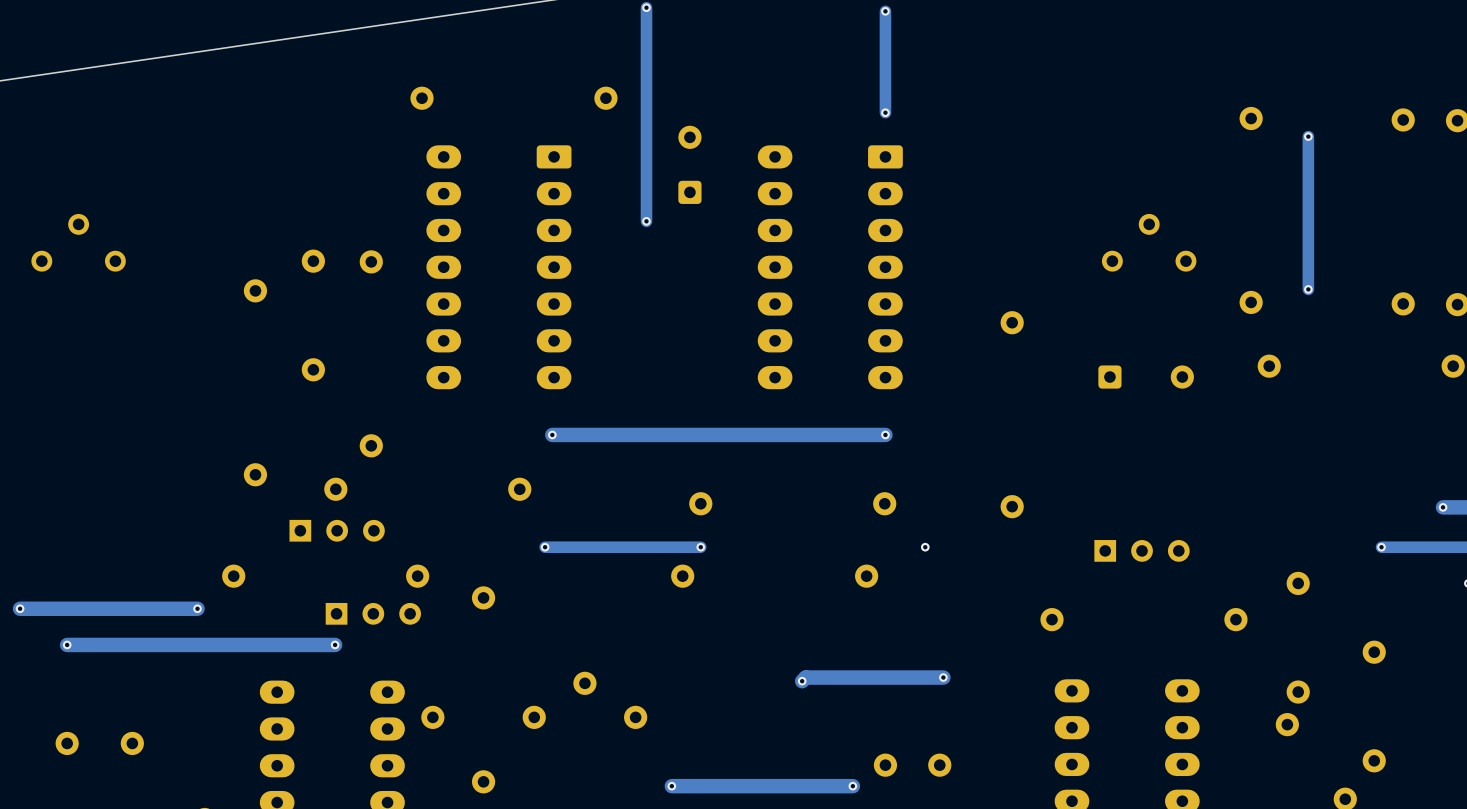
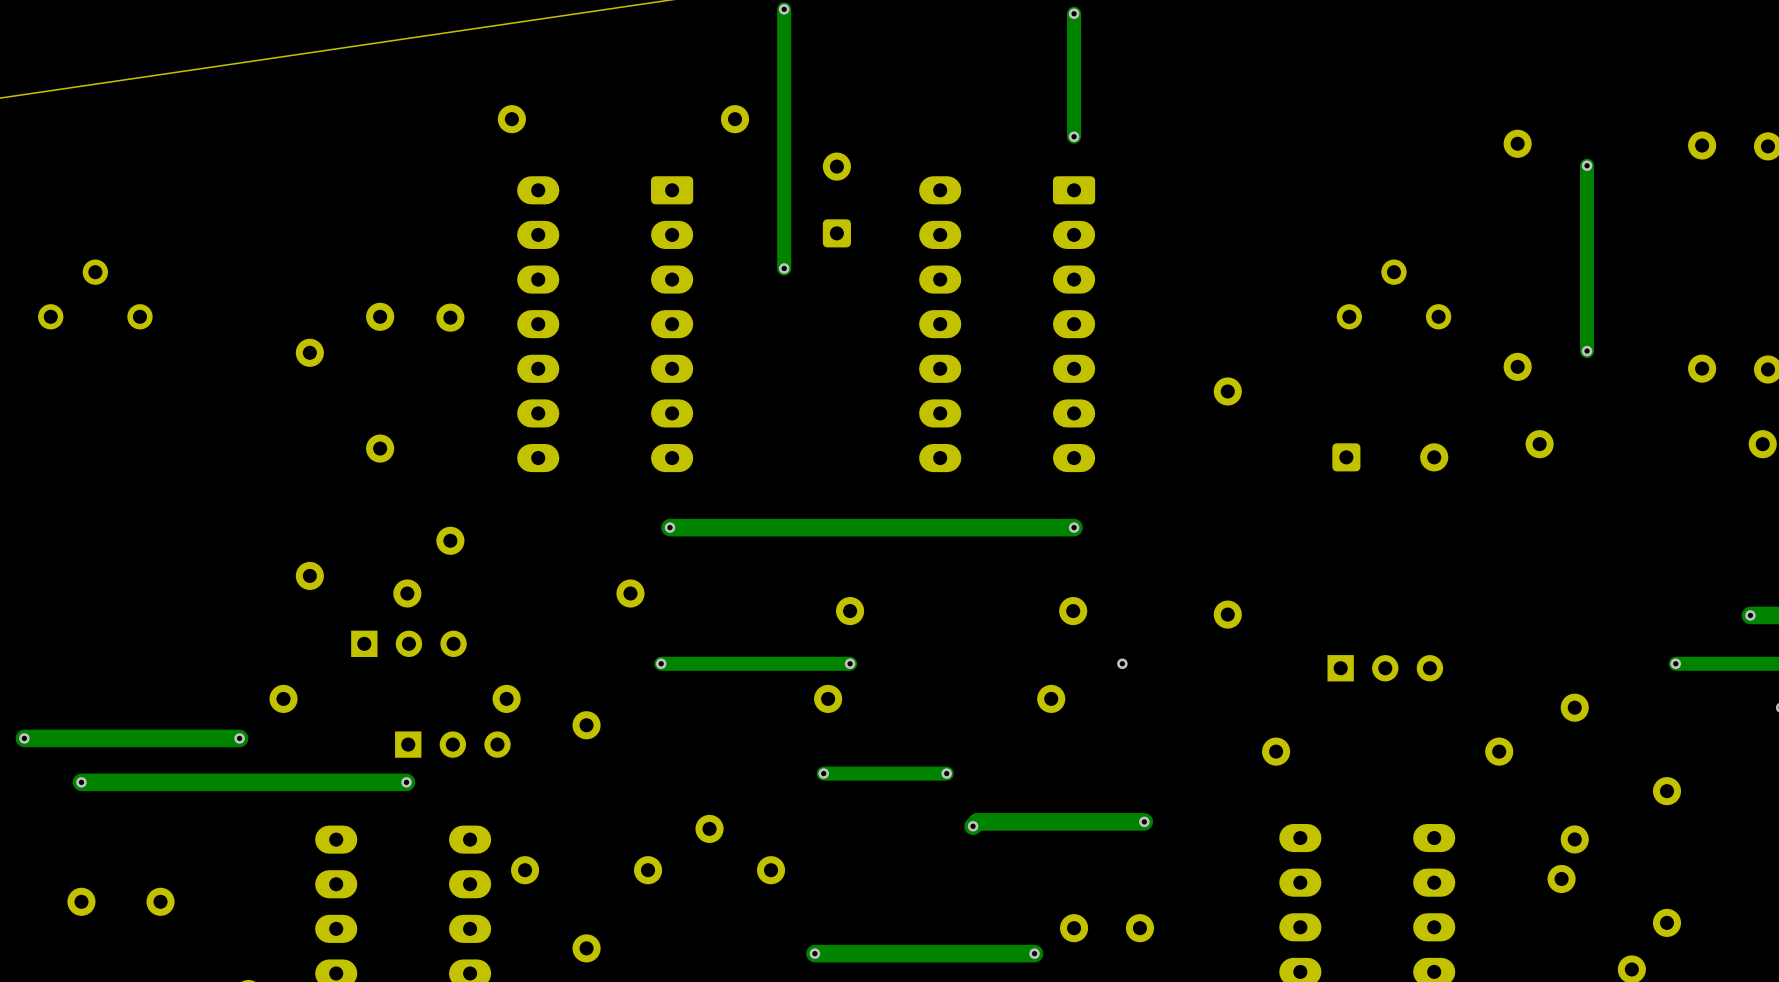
via: none -> (823, 773)
track: none -> (946, 773) (823, 773)
via: none -> (946, 773)

